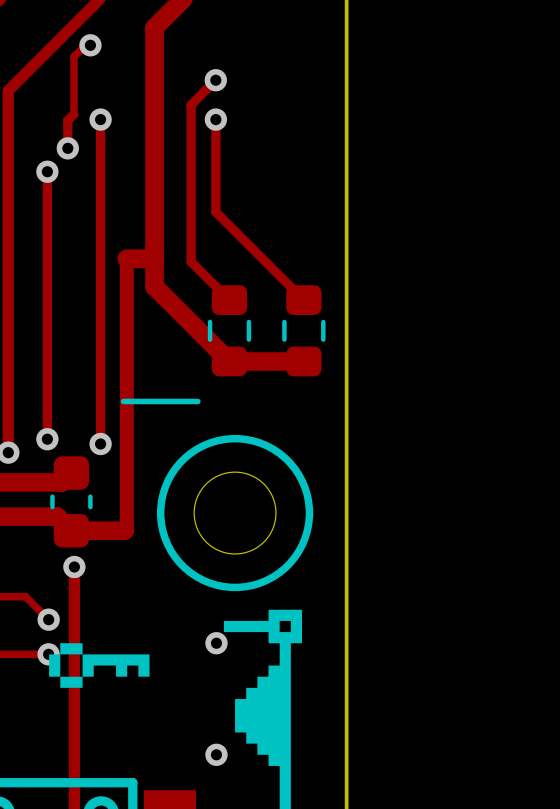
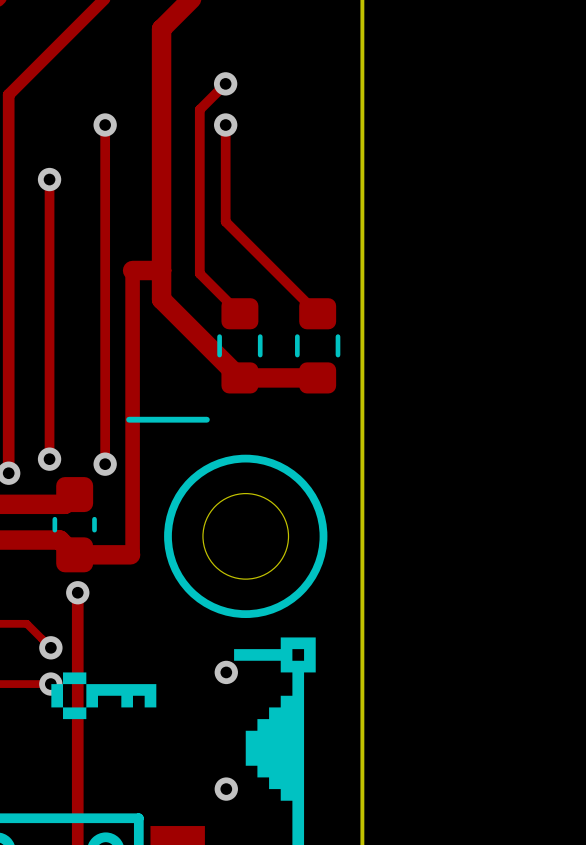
track: (90, 45) (85, 45) (73, 56) (73, 114) (67, 120) (67, 148) -> none
via: (90, 45) -> none
via: (67, 148) -> none

